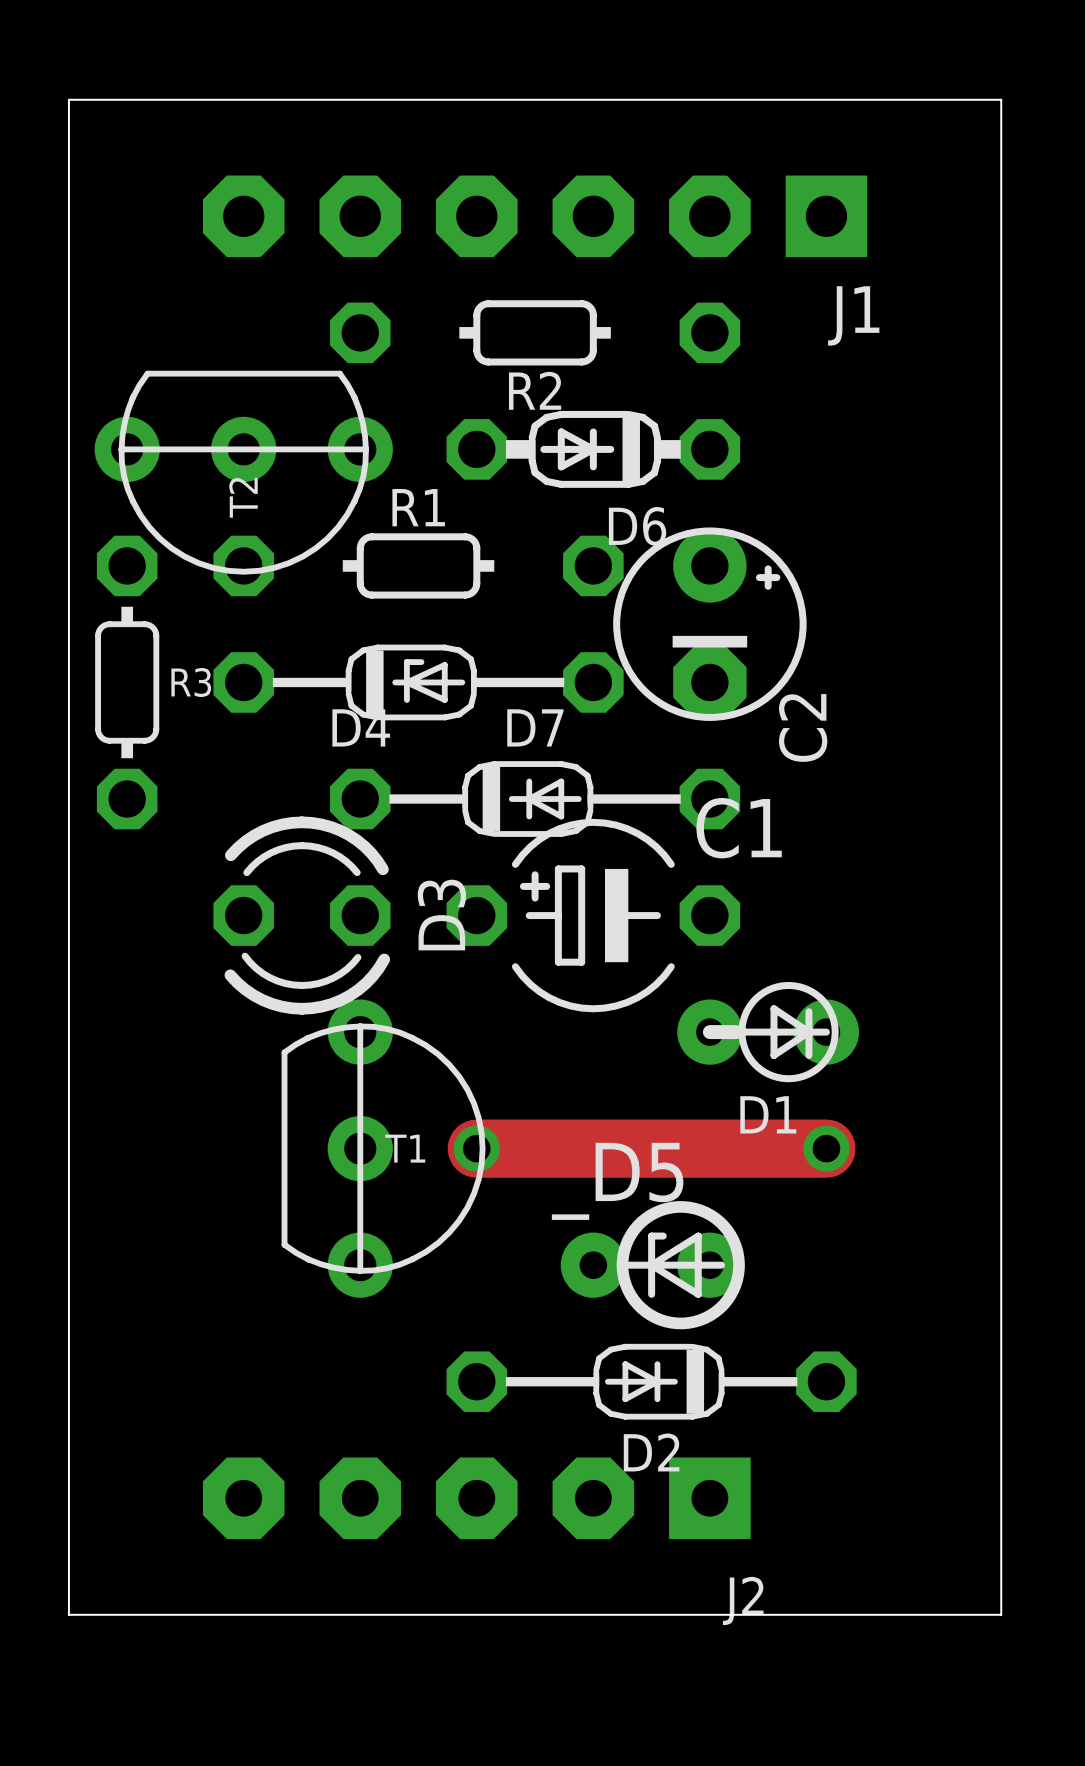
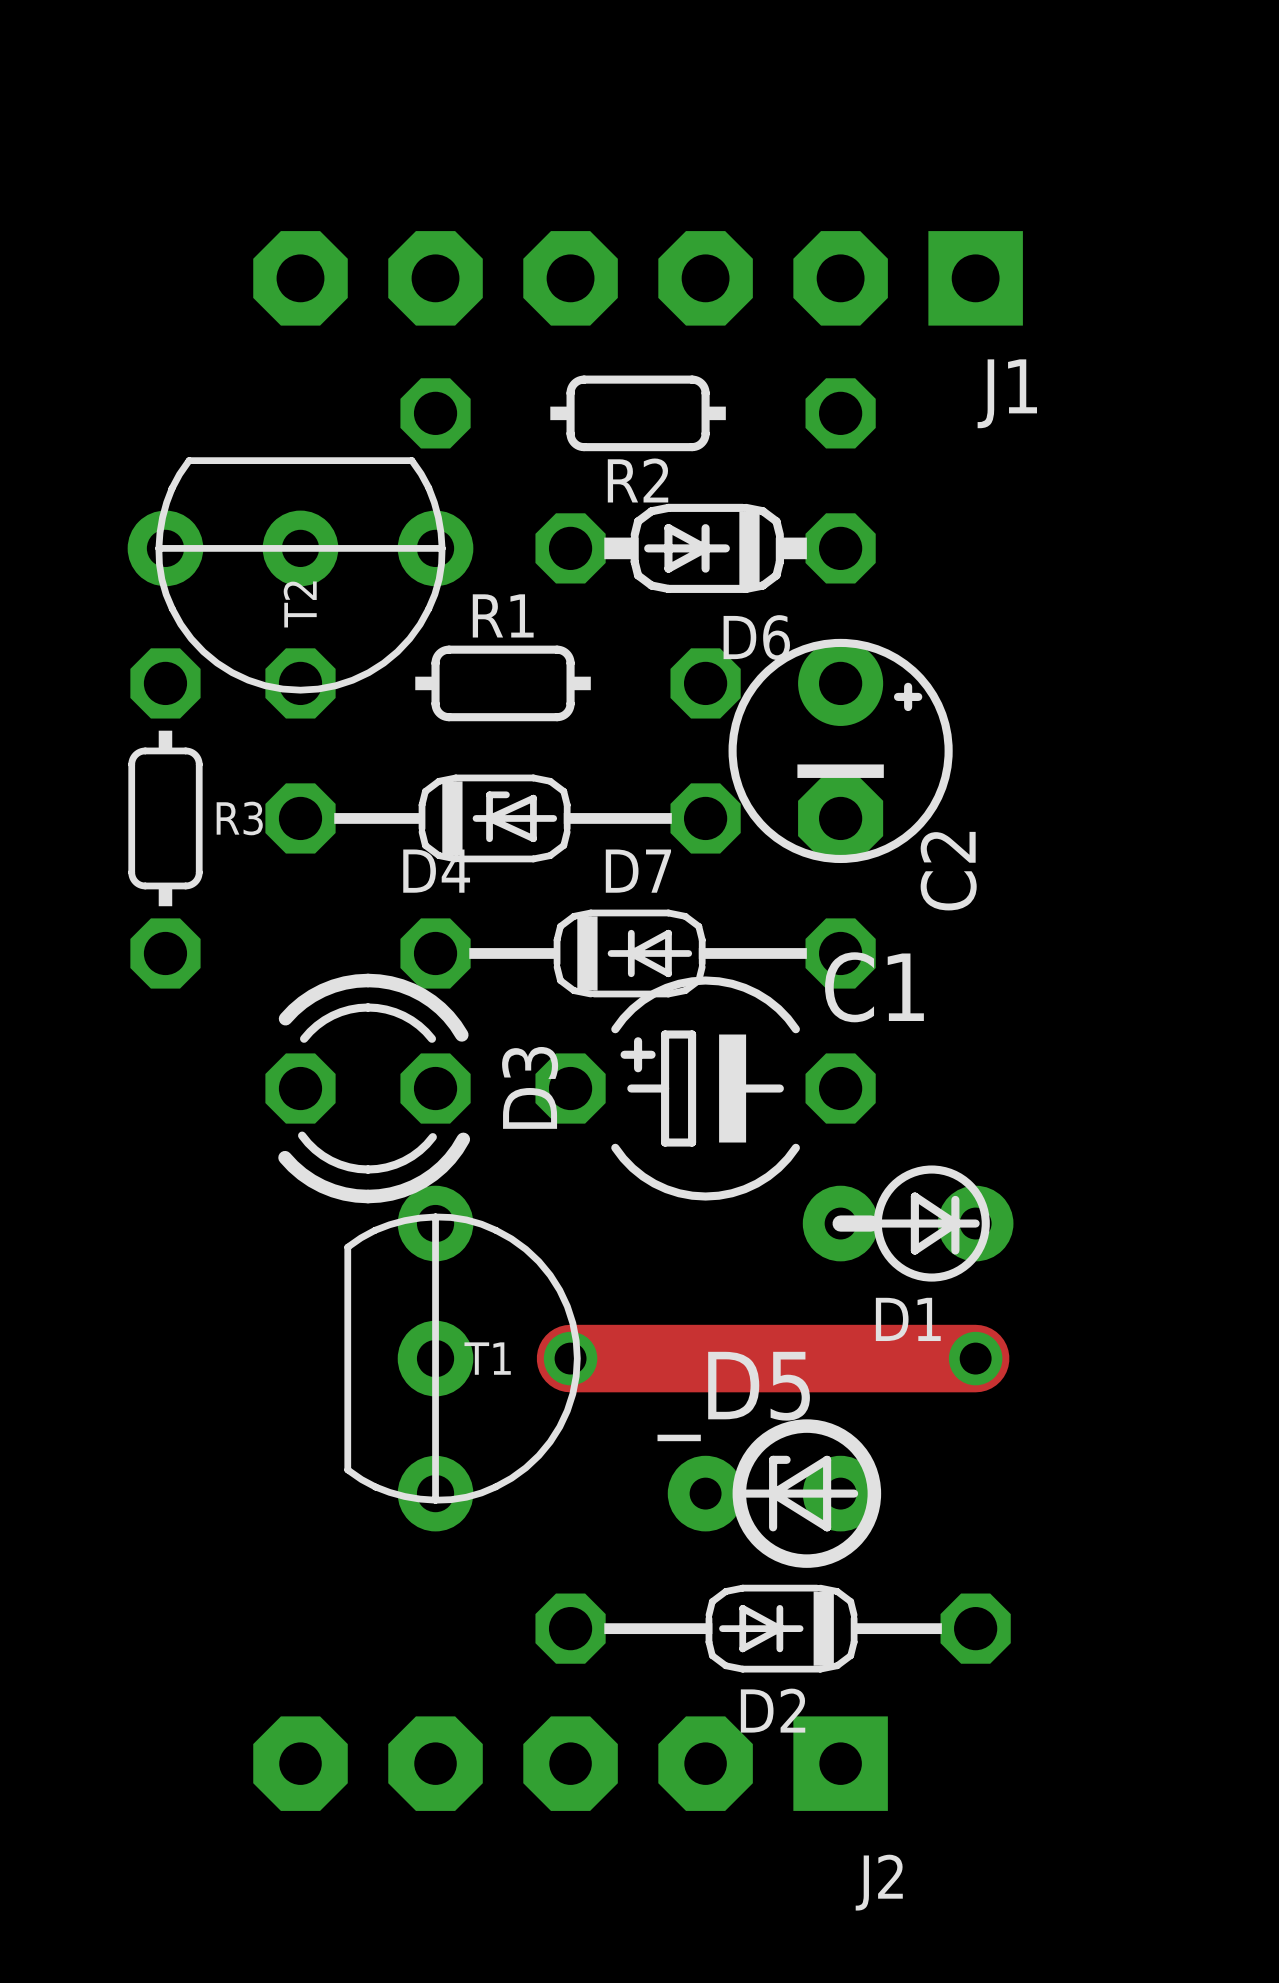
board edge: (68, 99) (1001, 99) (1001, 1614) (68, 1614) (68, 99) -> none

